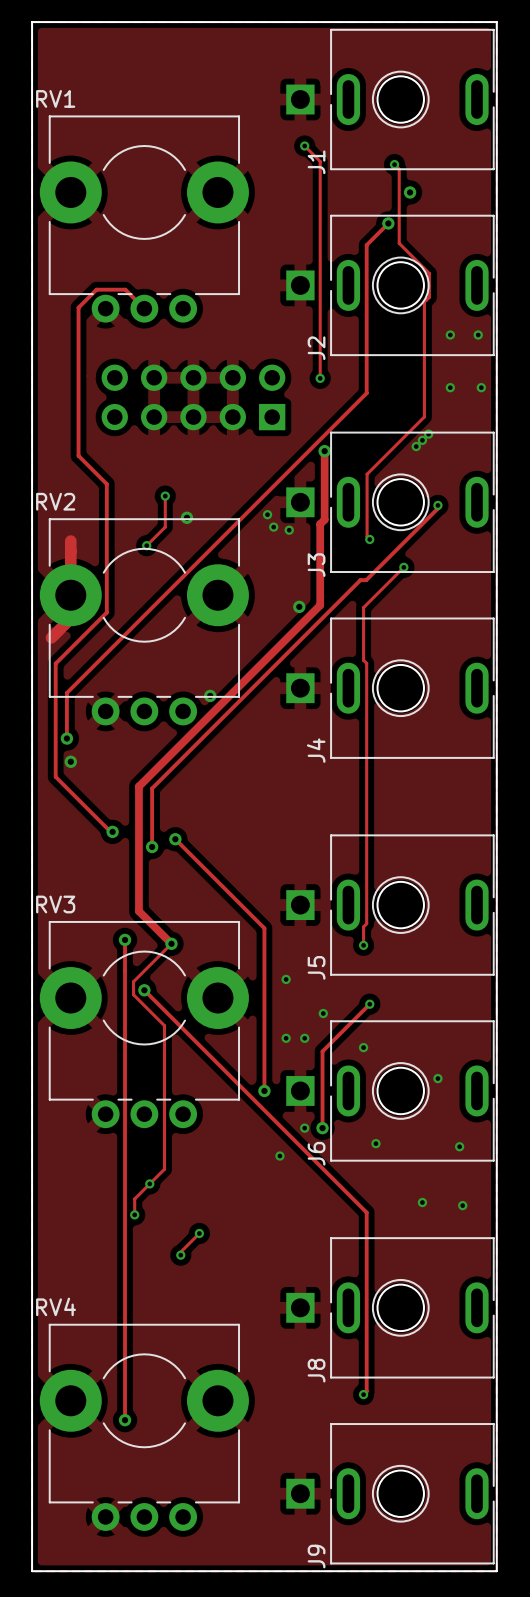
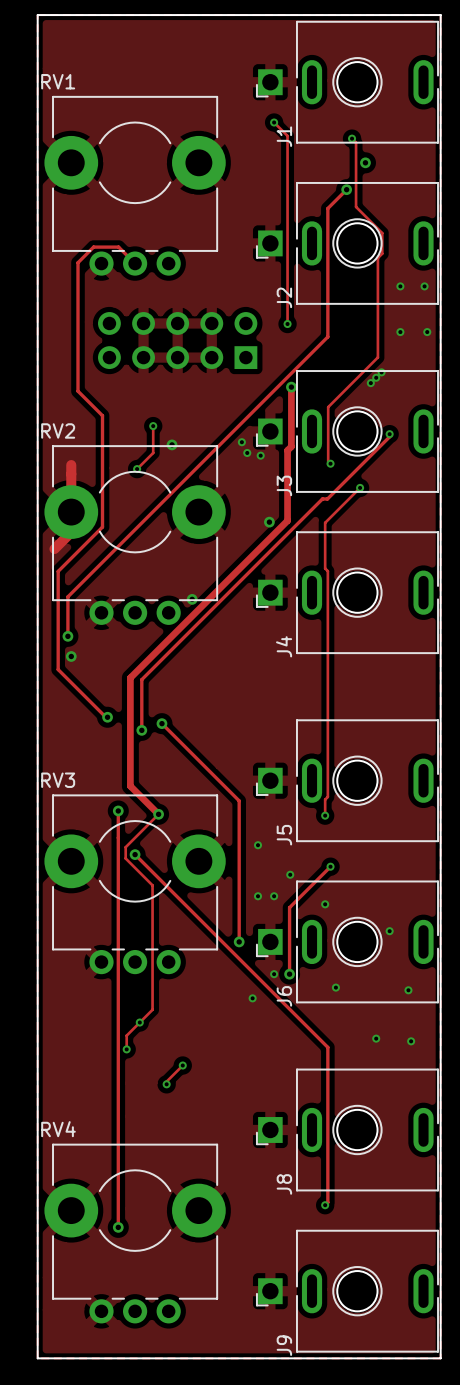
J1 footprint: [286, 28, 495, 171] -> [256, 20, 439, 144]
J2 footprint: [286, 214, 495, 357] -> [256, 182, 439, 305]
J3 footprint: [286, 431, 495, 573] -> [256, 370, 439, 493]
J4 footprint: [286, 617, 495, 759] -> [256, 531, 439, 654]
J5 footprint: [286, 834, 495, 976] -> [256, 719, 439, 842]
J6 footprint: [286, 1020, 495, 1162] -> [256, 880, 439, 1004]
J8 footprint: [286, 1237, 495, 1379] -> [256, 1068, 439, 1192]
J9 footprint: [286, 1423, 495, 1565] -> [256, 1229, 439, 1353]

